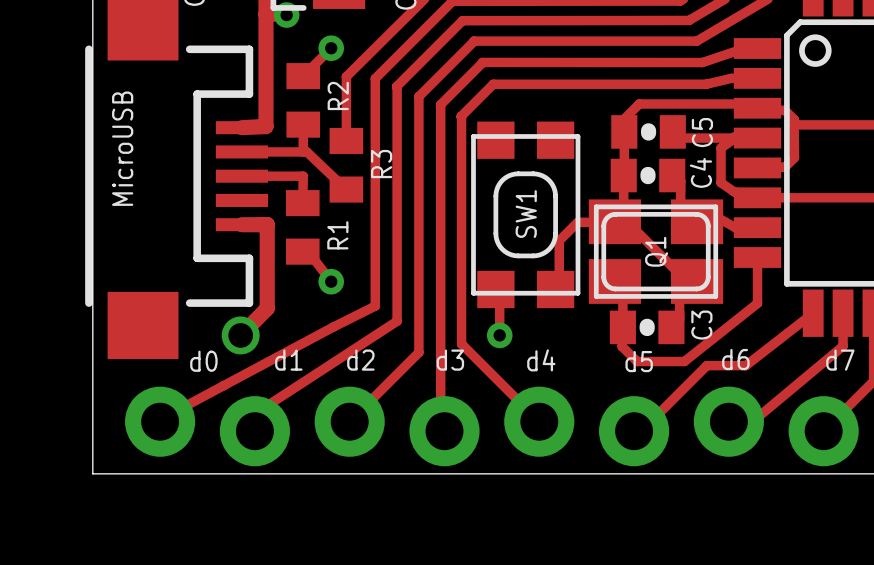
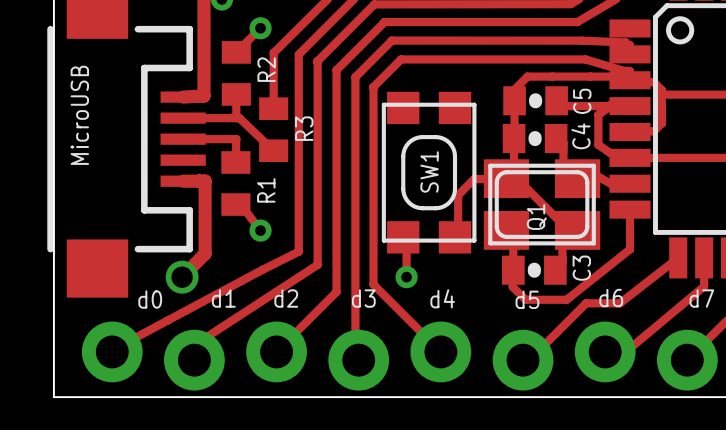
track: (757, 48) (752, 53) (752, 45) (702, 62) -> (630, 44) (625, 49) (625, 42) (582, 40)
track: (757, 78) (731, 78) (706, 84) -> (630, 70) (623, 70) (585, 59)
text position: Q1 (656, 251) -> Q1 (536, 216)

